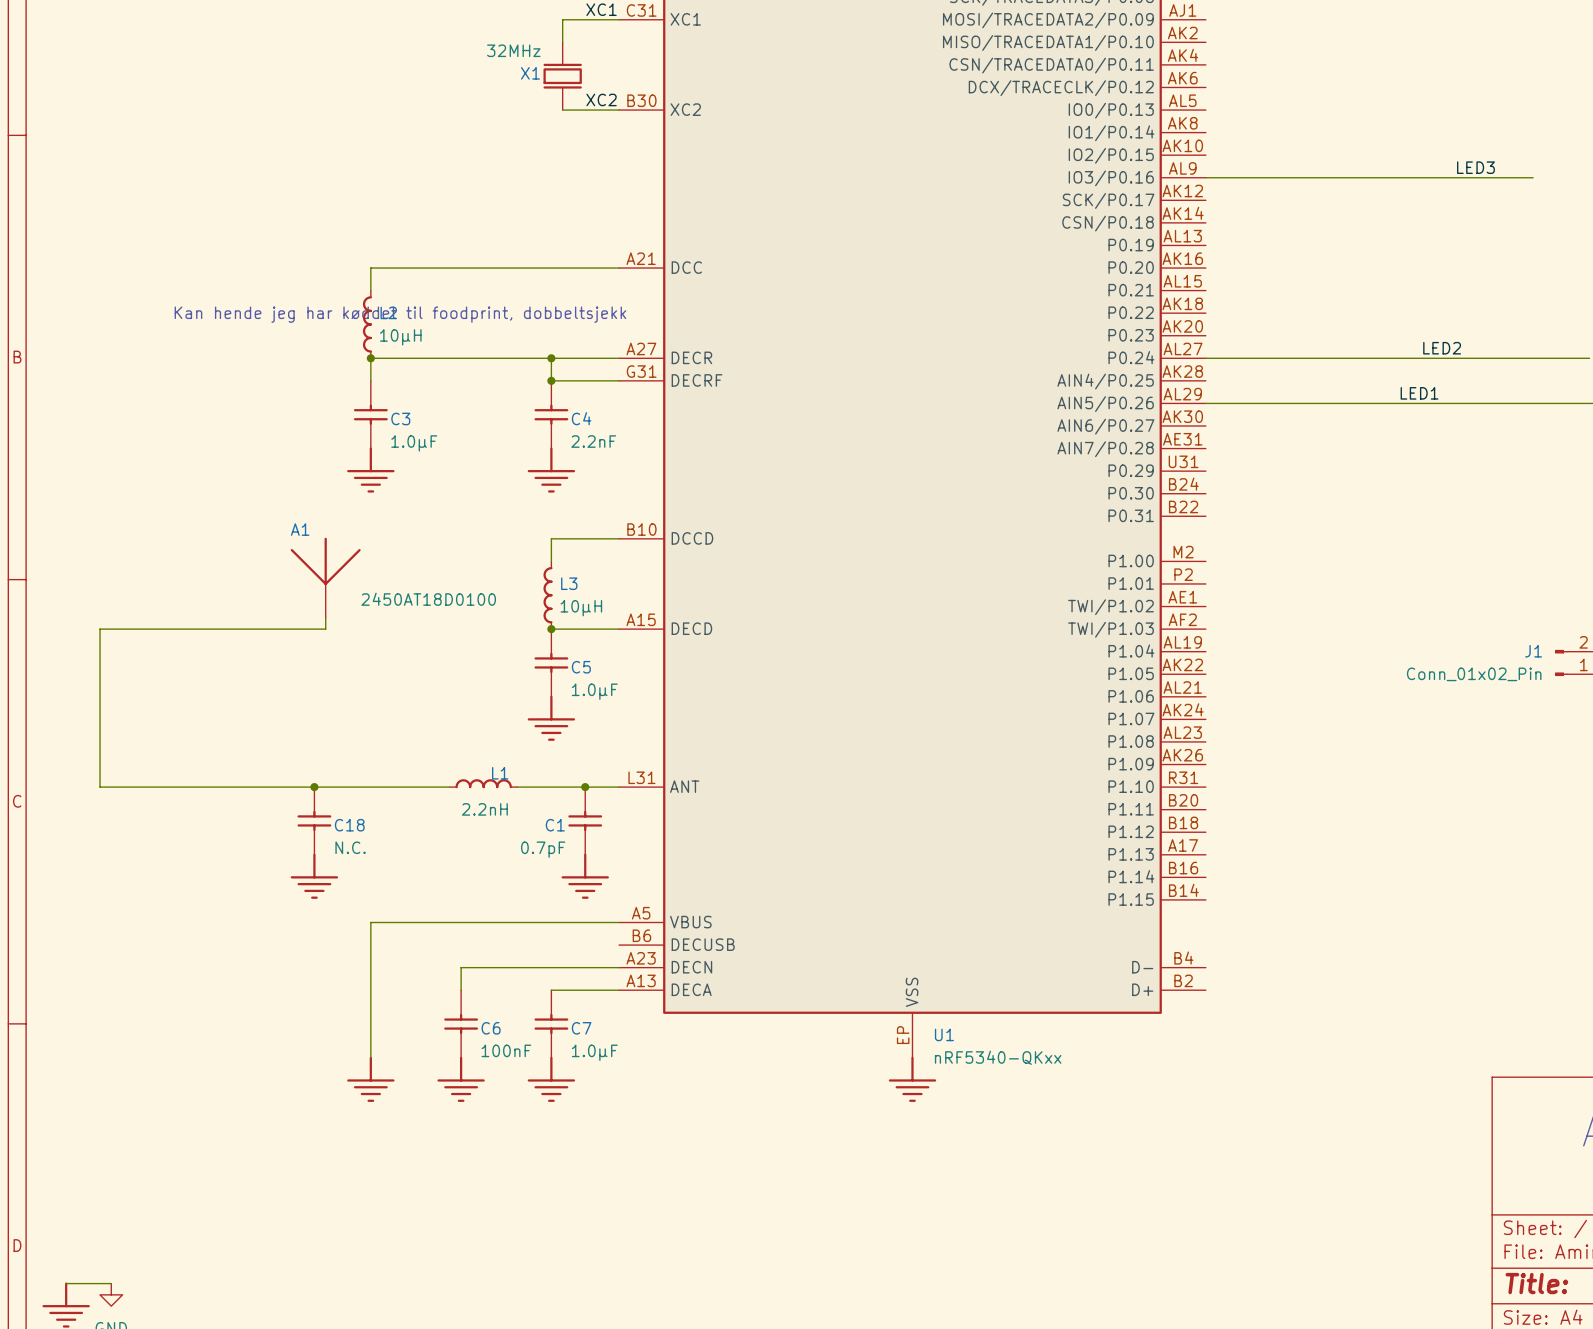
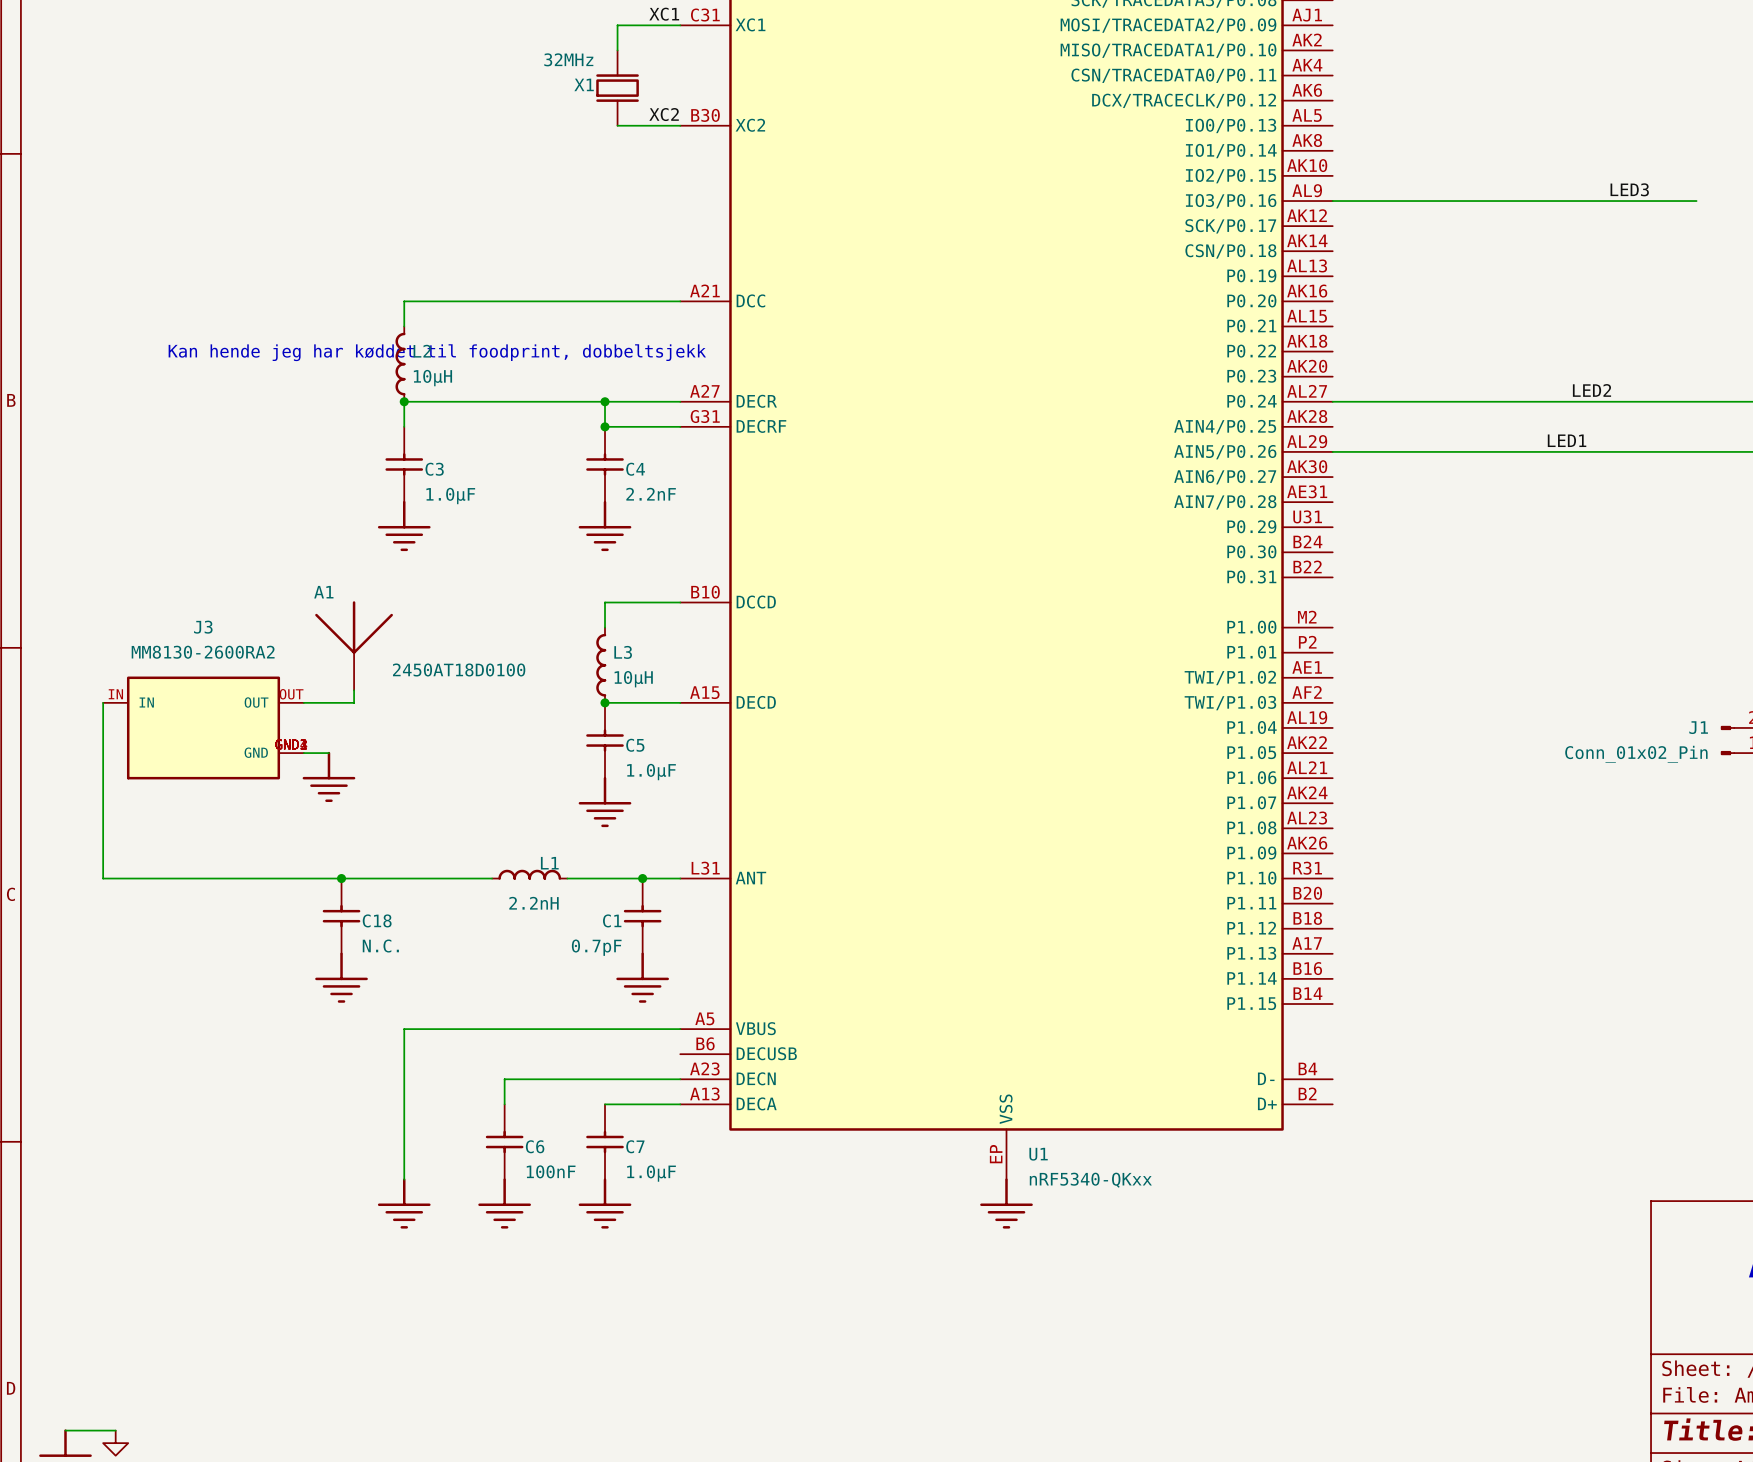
J3: none -> MM8130-2600RA2 (203, 727)
wire: none -> (303, 753) (328, 753)
power symbol: none -> (328, 776)

